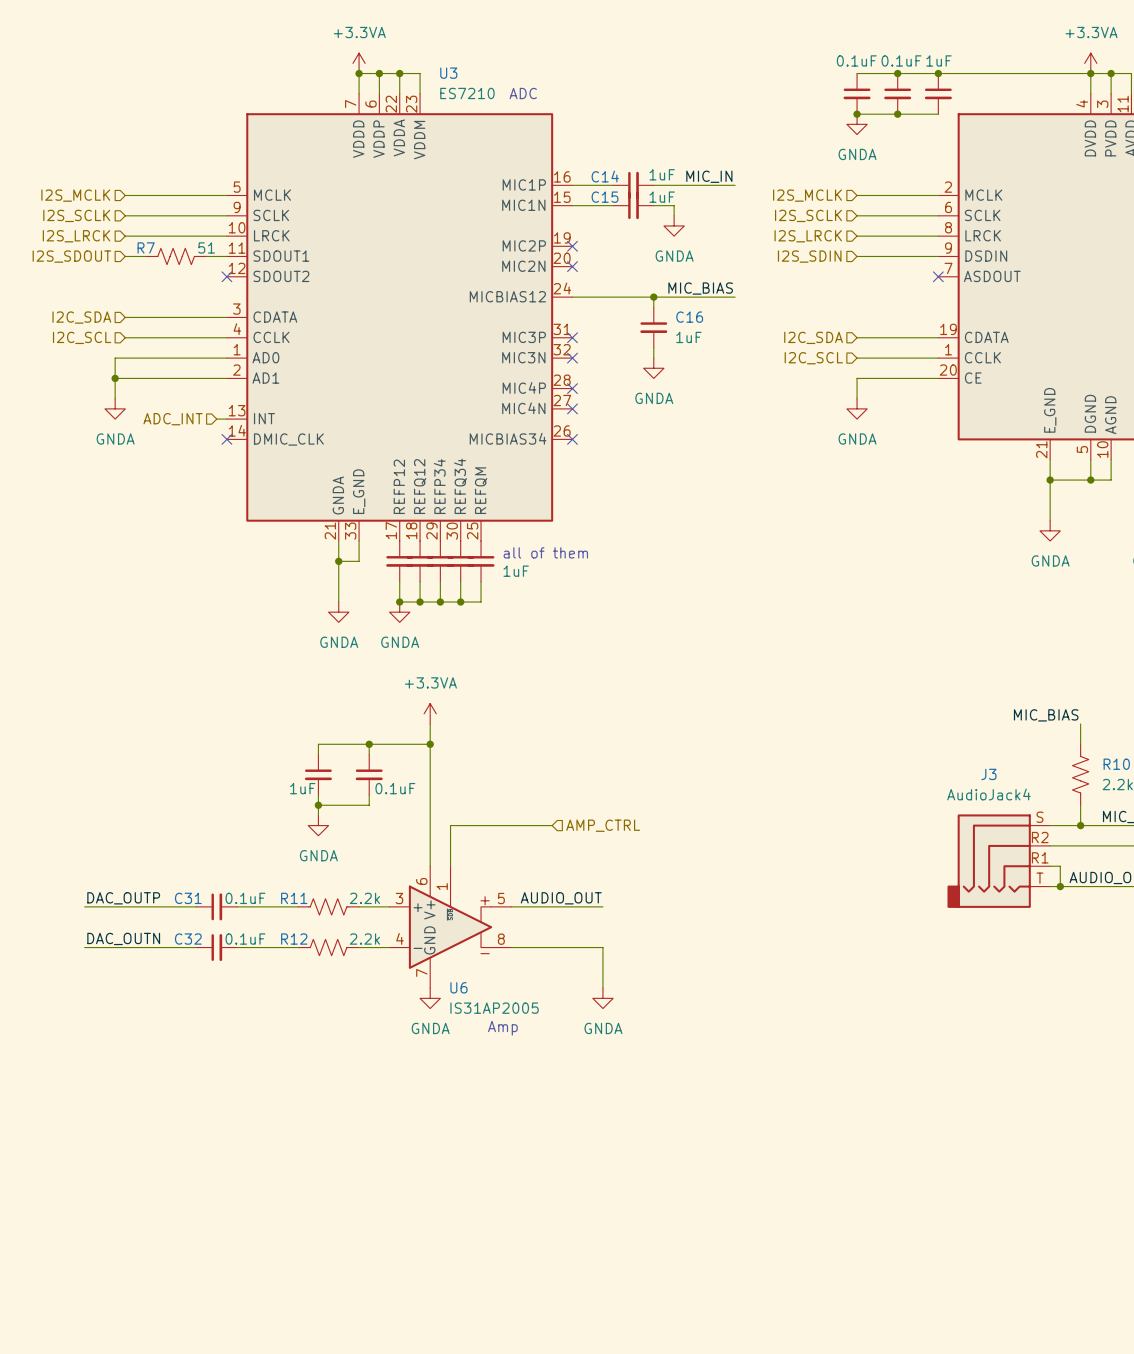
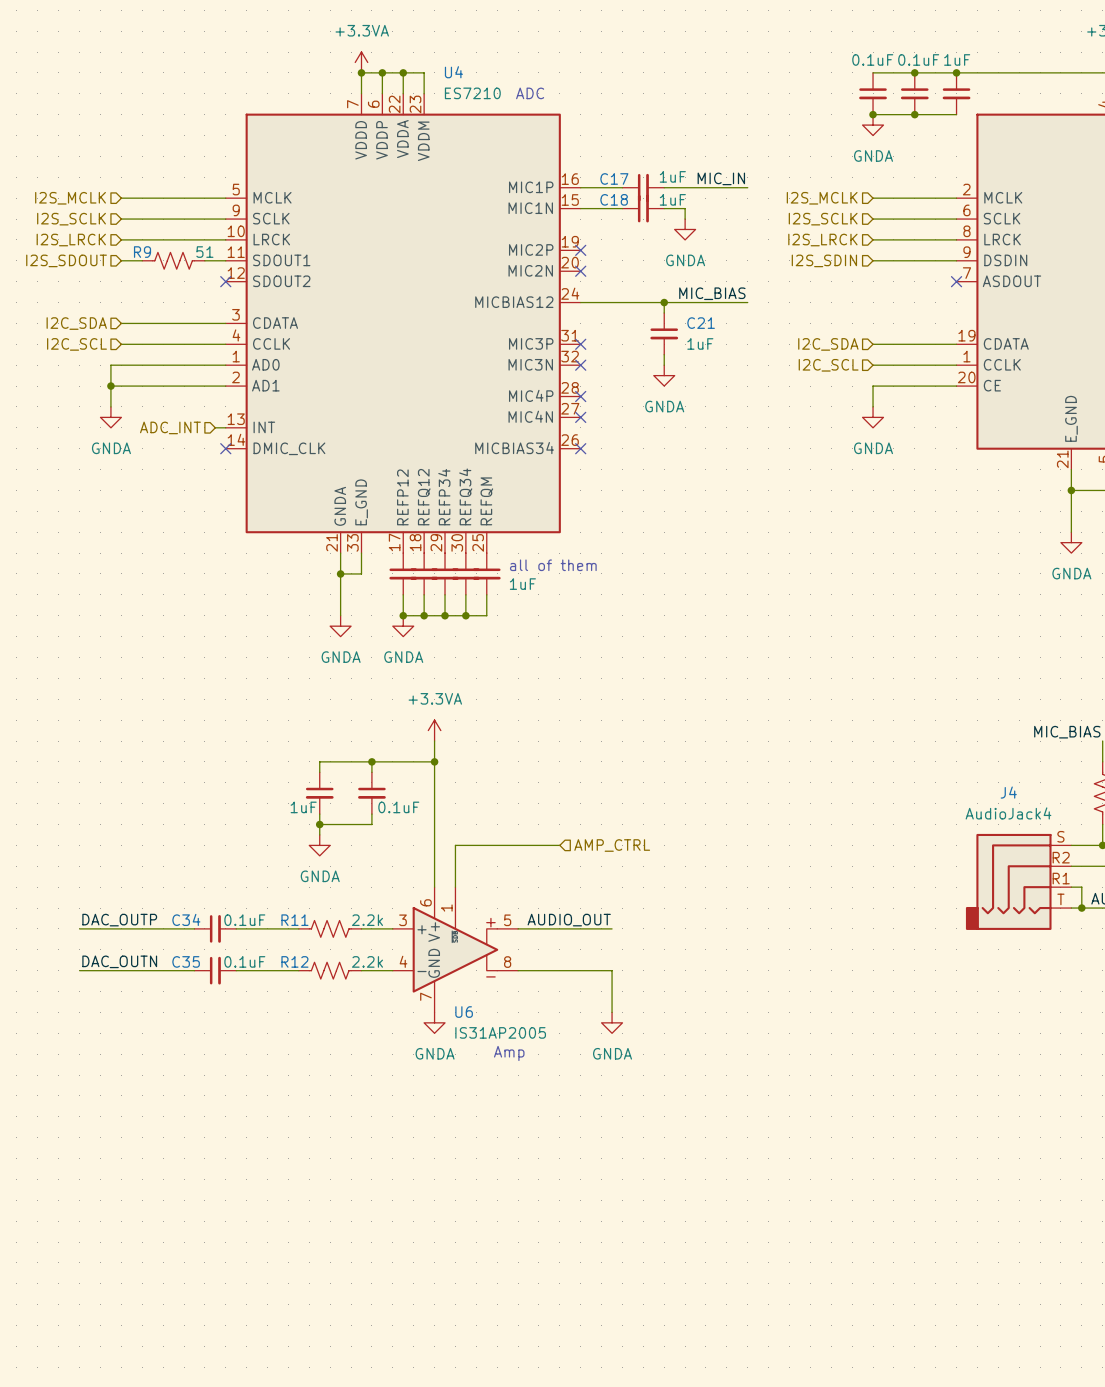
U3 name: U3 (448, 73) -> U4 (453, 72)
C14 name: C14 (605, 176) -> C17 (614, 178)
C15 name: C15 (605, 197) -> C18 (614, 199)
R7 name: R7 (146, 247) -> R9 (142, 252)
C16 name: C16 (689, 317) -> C21 (701, 323)
J3 name: J3 (988, 774) -> J4 (1008, 792)
C31 name: C31 (188, 898) -> C34 (186, 919)
C32 name: C32 (188, 939) -> C35 (186, 961)

